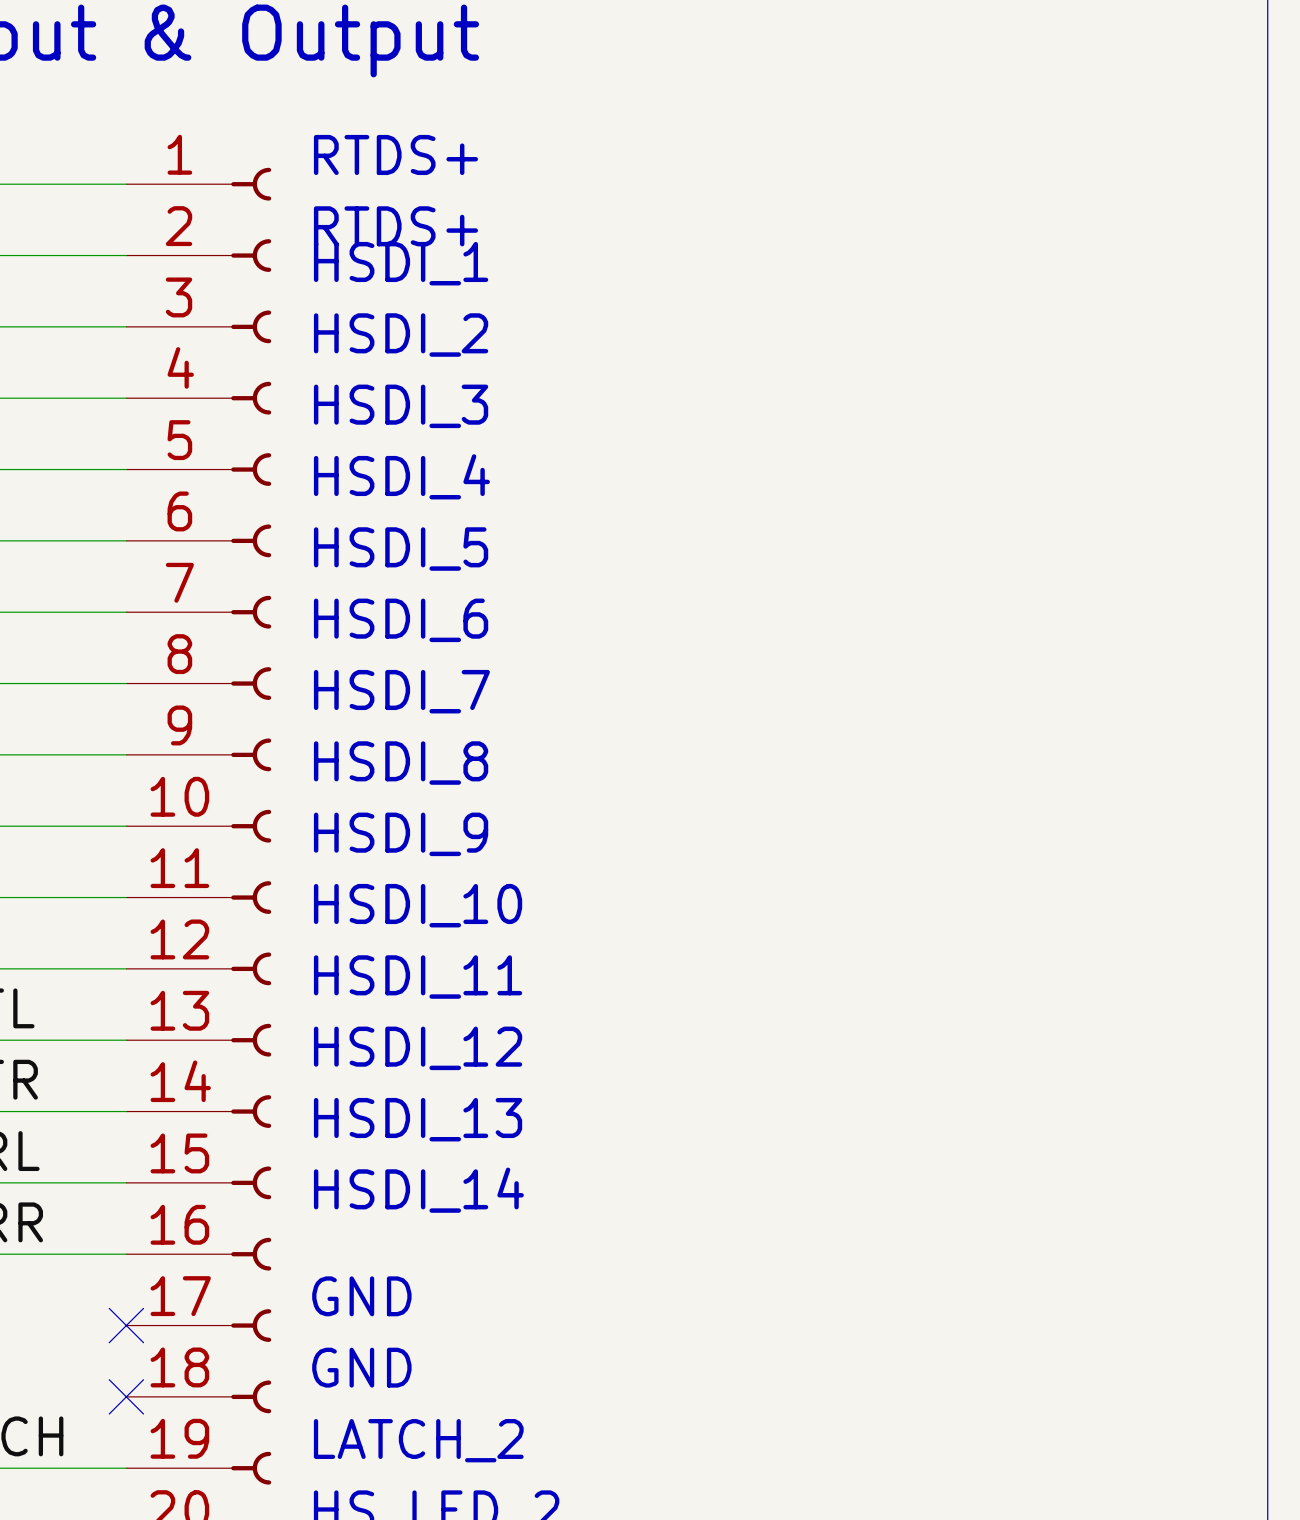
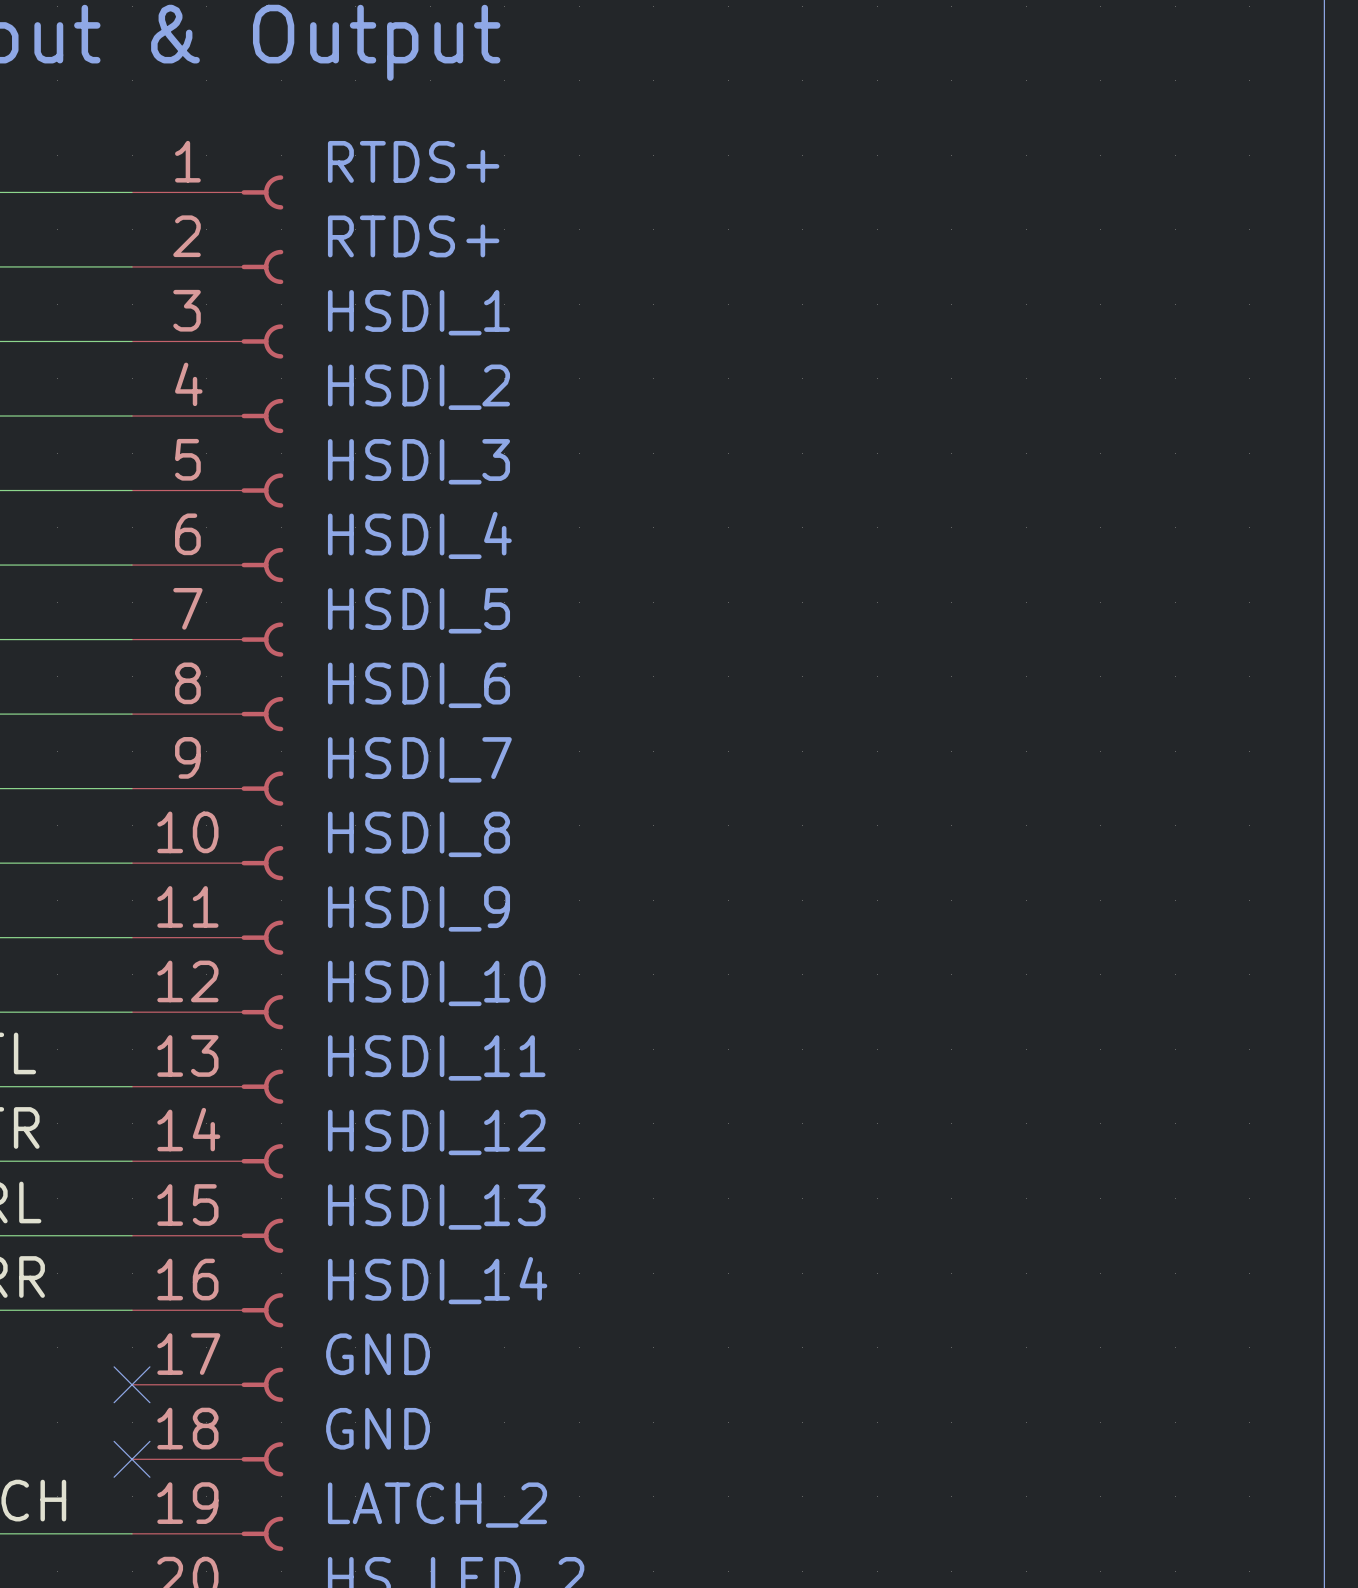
text position: HSDI_1 (401, 263) -> HSDI_1 (418, 312)
text position: HSDI_2 (401, 335) -> HSDI_2 (418, 387)
text position: HSDI_3 (401, 406) -> HSDI_3 (418, 461)
text position: HSDI_4 (401, 476) -> HSDI_4 (419, 535)
text position: HSDI_5 (401, 549) -> HSDI_5 (418, 610)
text position: HSDI_6 (401, 620) -> HSDI_6 (418, 685)
text position: HSDI_7 (401, 691) -> HSDI_7 (419, 759)
text position: HSDI_8 (401, 763) -> HSDI_8 (418, 834)
text position: HSDI_9 (401, 834) -> HSDI_9 (418, 908)
text position: HSDI_10 (418, 905) -> HSDI_10 (436, 983)
text position: HSDI_11 (418, 977) -> HSDI_11 (436, 1057)
text position: HSDI_12 (418, 1048) -> HSDI_12 (436, 1132)
text position: HSDI_13 (418, 1119) -> HSDI_13 (436, 1206)
text position: HSDI_14 (418, 1190) -> HSDI_14 (437, 1280)

